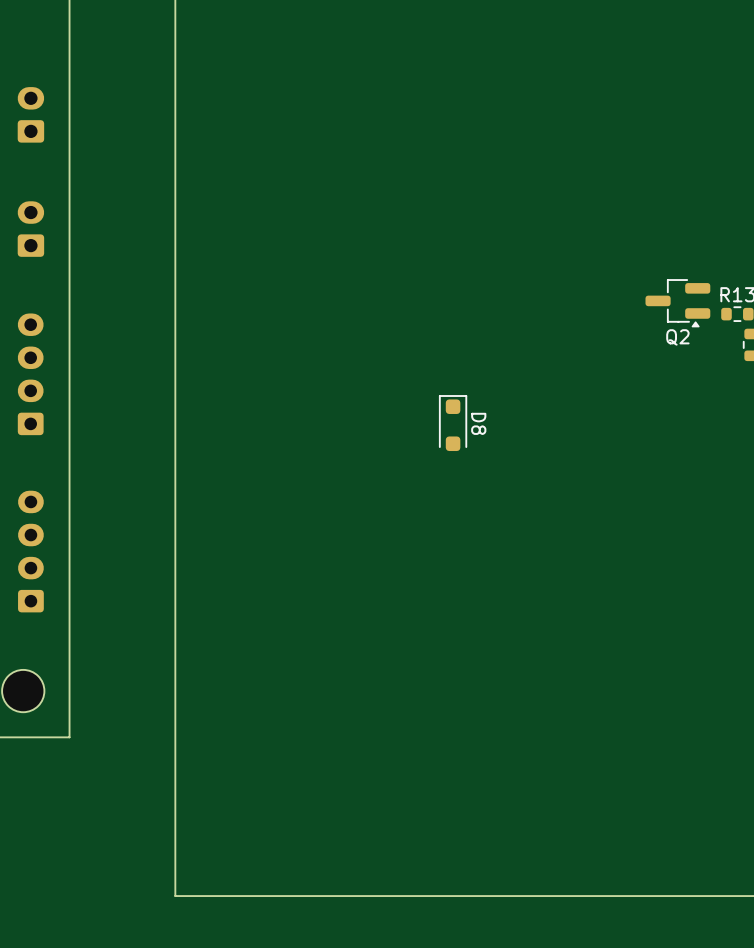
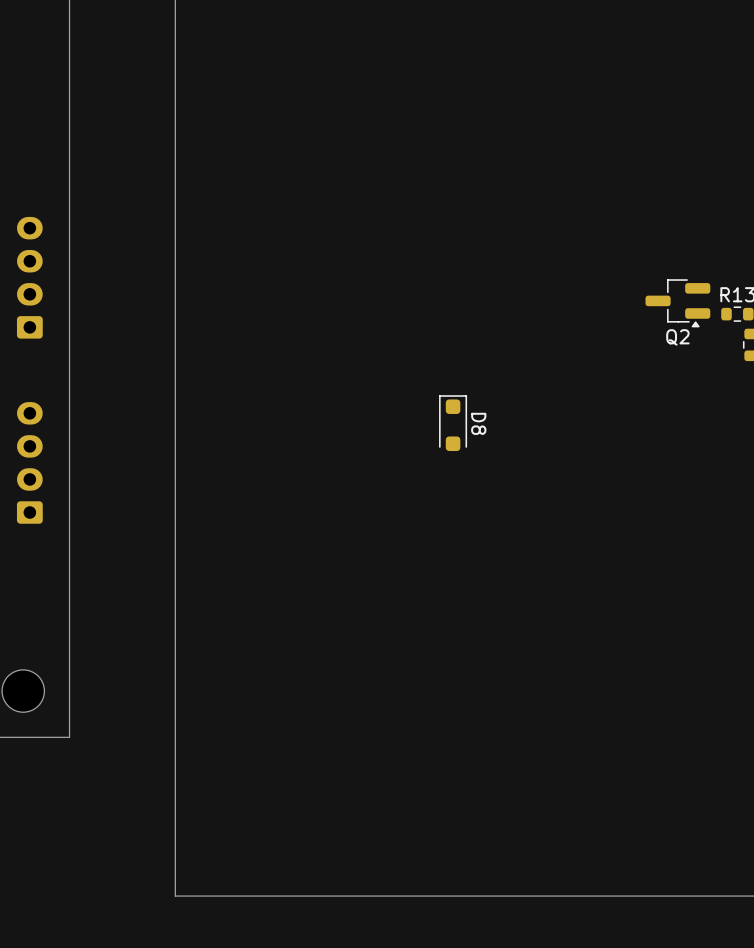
part: (30, 114) -> none
part: (30, 229) -> none
part: none -> (29, 277)
part: (30, 374) -> none
part: none -> (29, 462)
part: (30, 551) -> none

